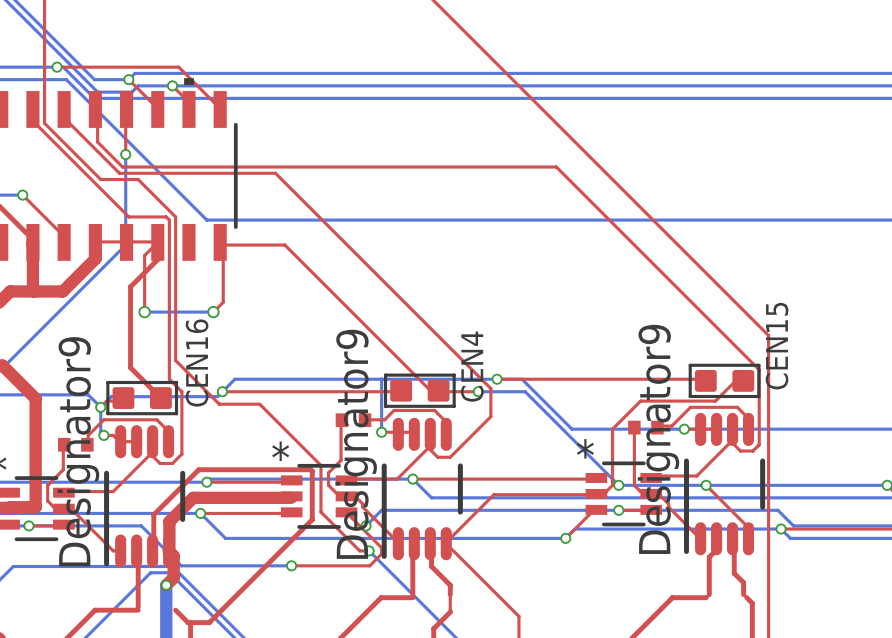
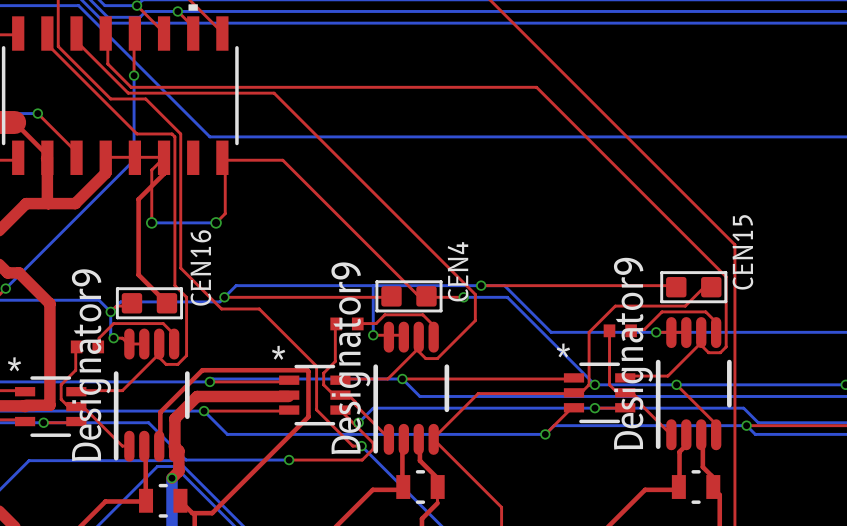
part: none -> (420, 487)
part: none -> (696, 487)
part: none -> (163, 500)

